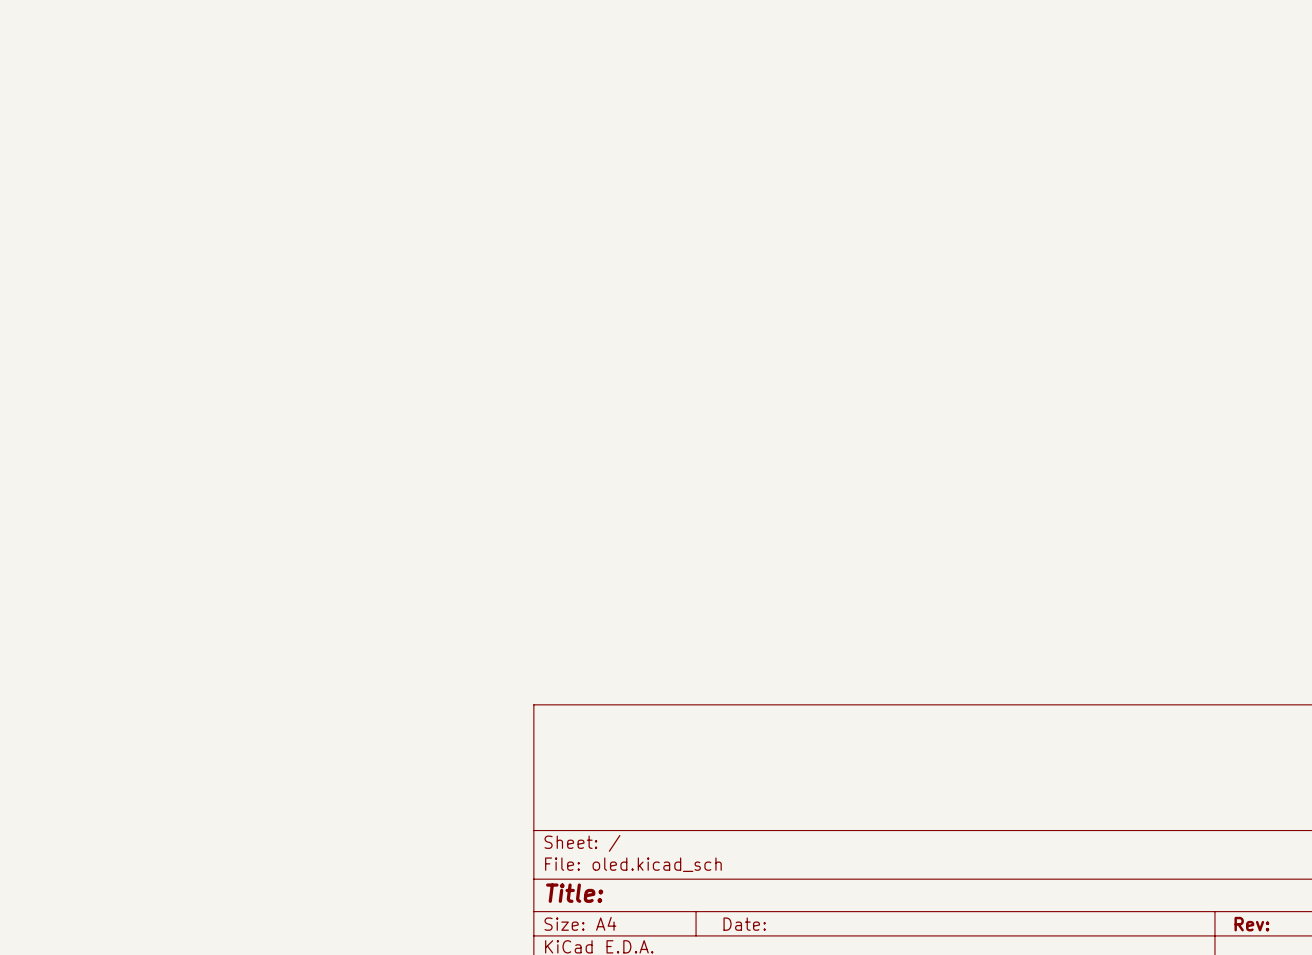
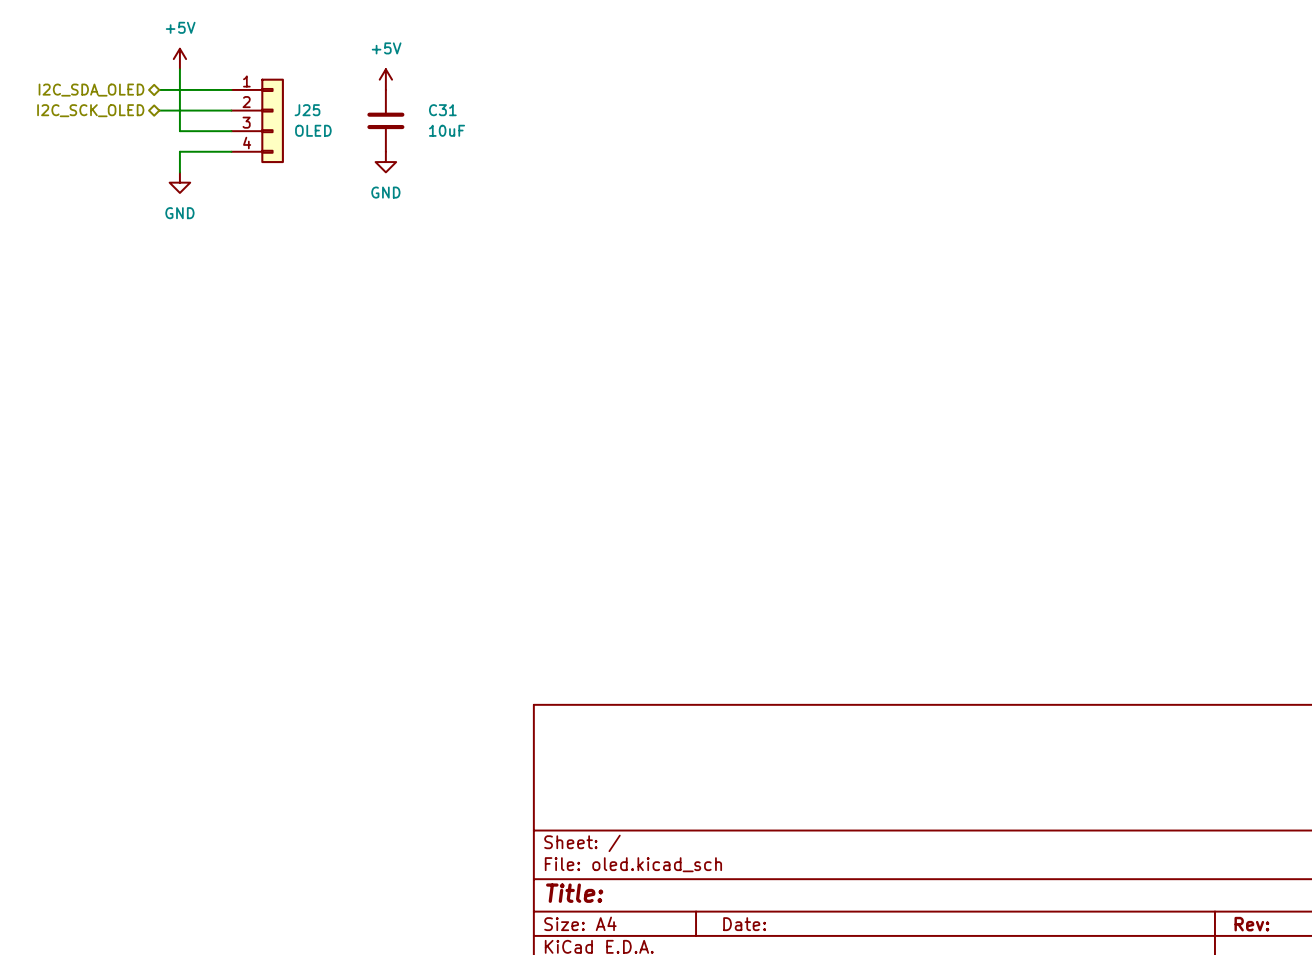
power symbol: none -> +5V (179, 59)
wire: none -> (179, 69) (179, 131) (231, 131)
power symbol: none -> +5V (385, 79)
wire: none -> (159, 89) (231, 89)
hierarchical label: none -> I2C_SDA_OLED (91, 90)
hierarchical label: none -> I2C_SCK_OLED (90, 110)
wire: none -> (159, 110) (231, 110)
J25: none -> OLED (257, 120)
C31: none -> 10uF (385, 120)
wire: none -> (231, 151) (179, 151) (179, 172)
power symbol: none -> GND (385, 162)
power symbol: none -> GND (179, 182)

